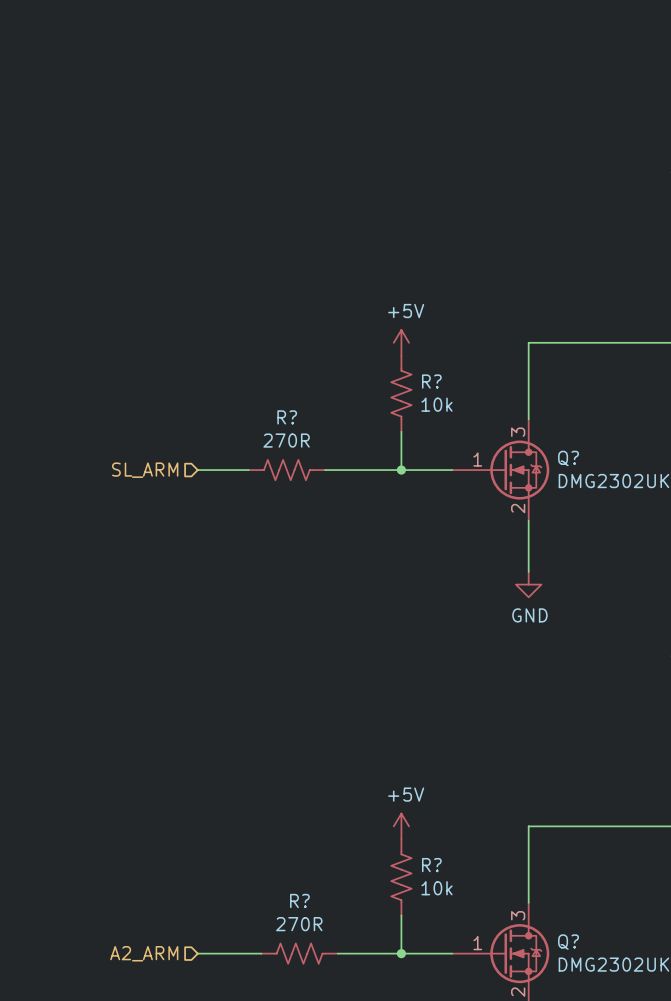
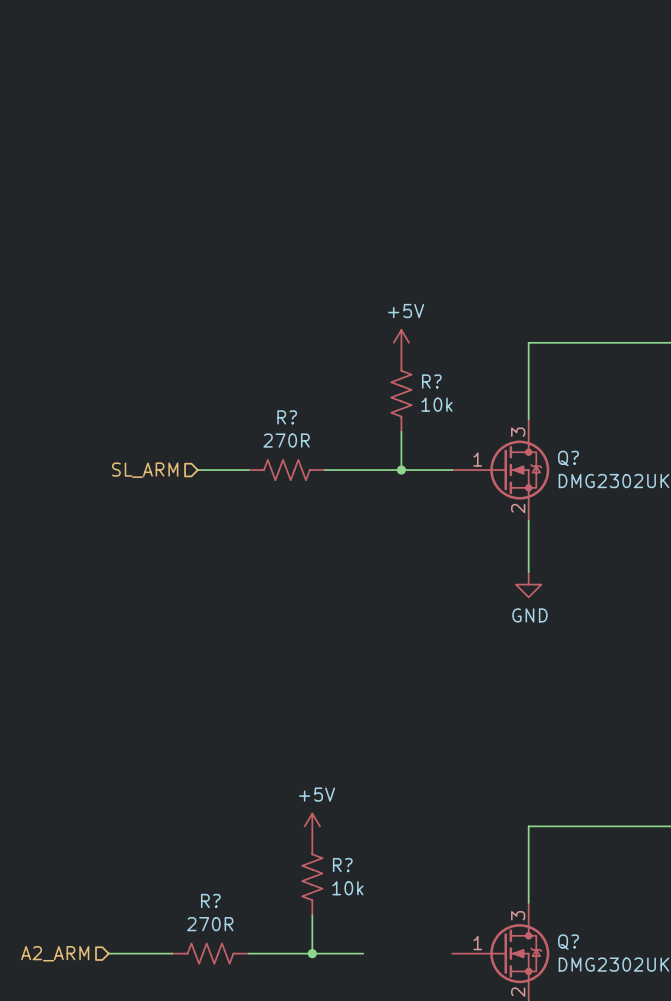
power symbol position: +5V (401, 826) -> +5V (312, 826)
R? position: (401, 877) -> (312, 877)
wire: (401, 915) (401, 953) -> (312, 915) (312, 953)
wire: none -> (108, 953) (172, 953)
hierarchical label position: A2_ARM (144, 953) -> A2_ARM (55, 953)
wire: (197, 953) (248, 953) -> none
R? position: (299, 953) -> (210, 953)
junction: none -> (312, 953)
wire: (363, 953) (452, 953) -> none
junction: (401, 953) -> none

